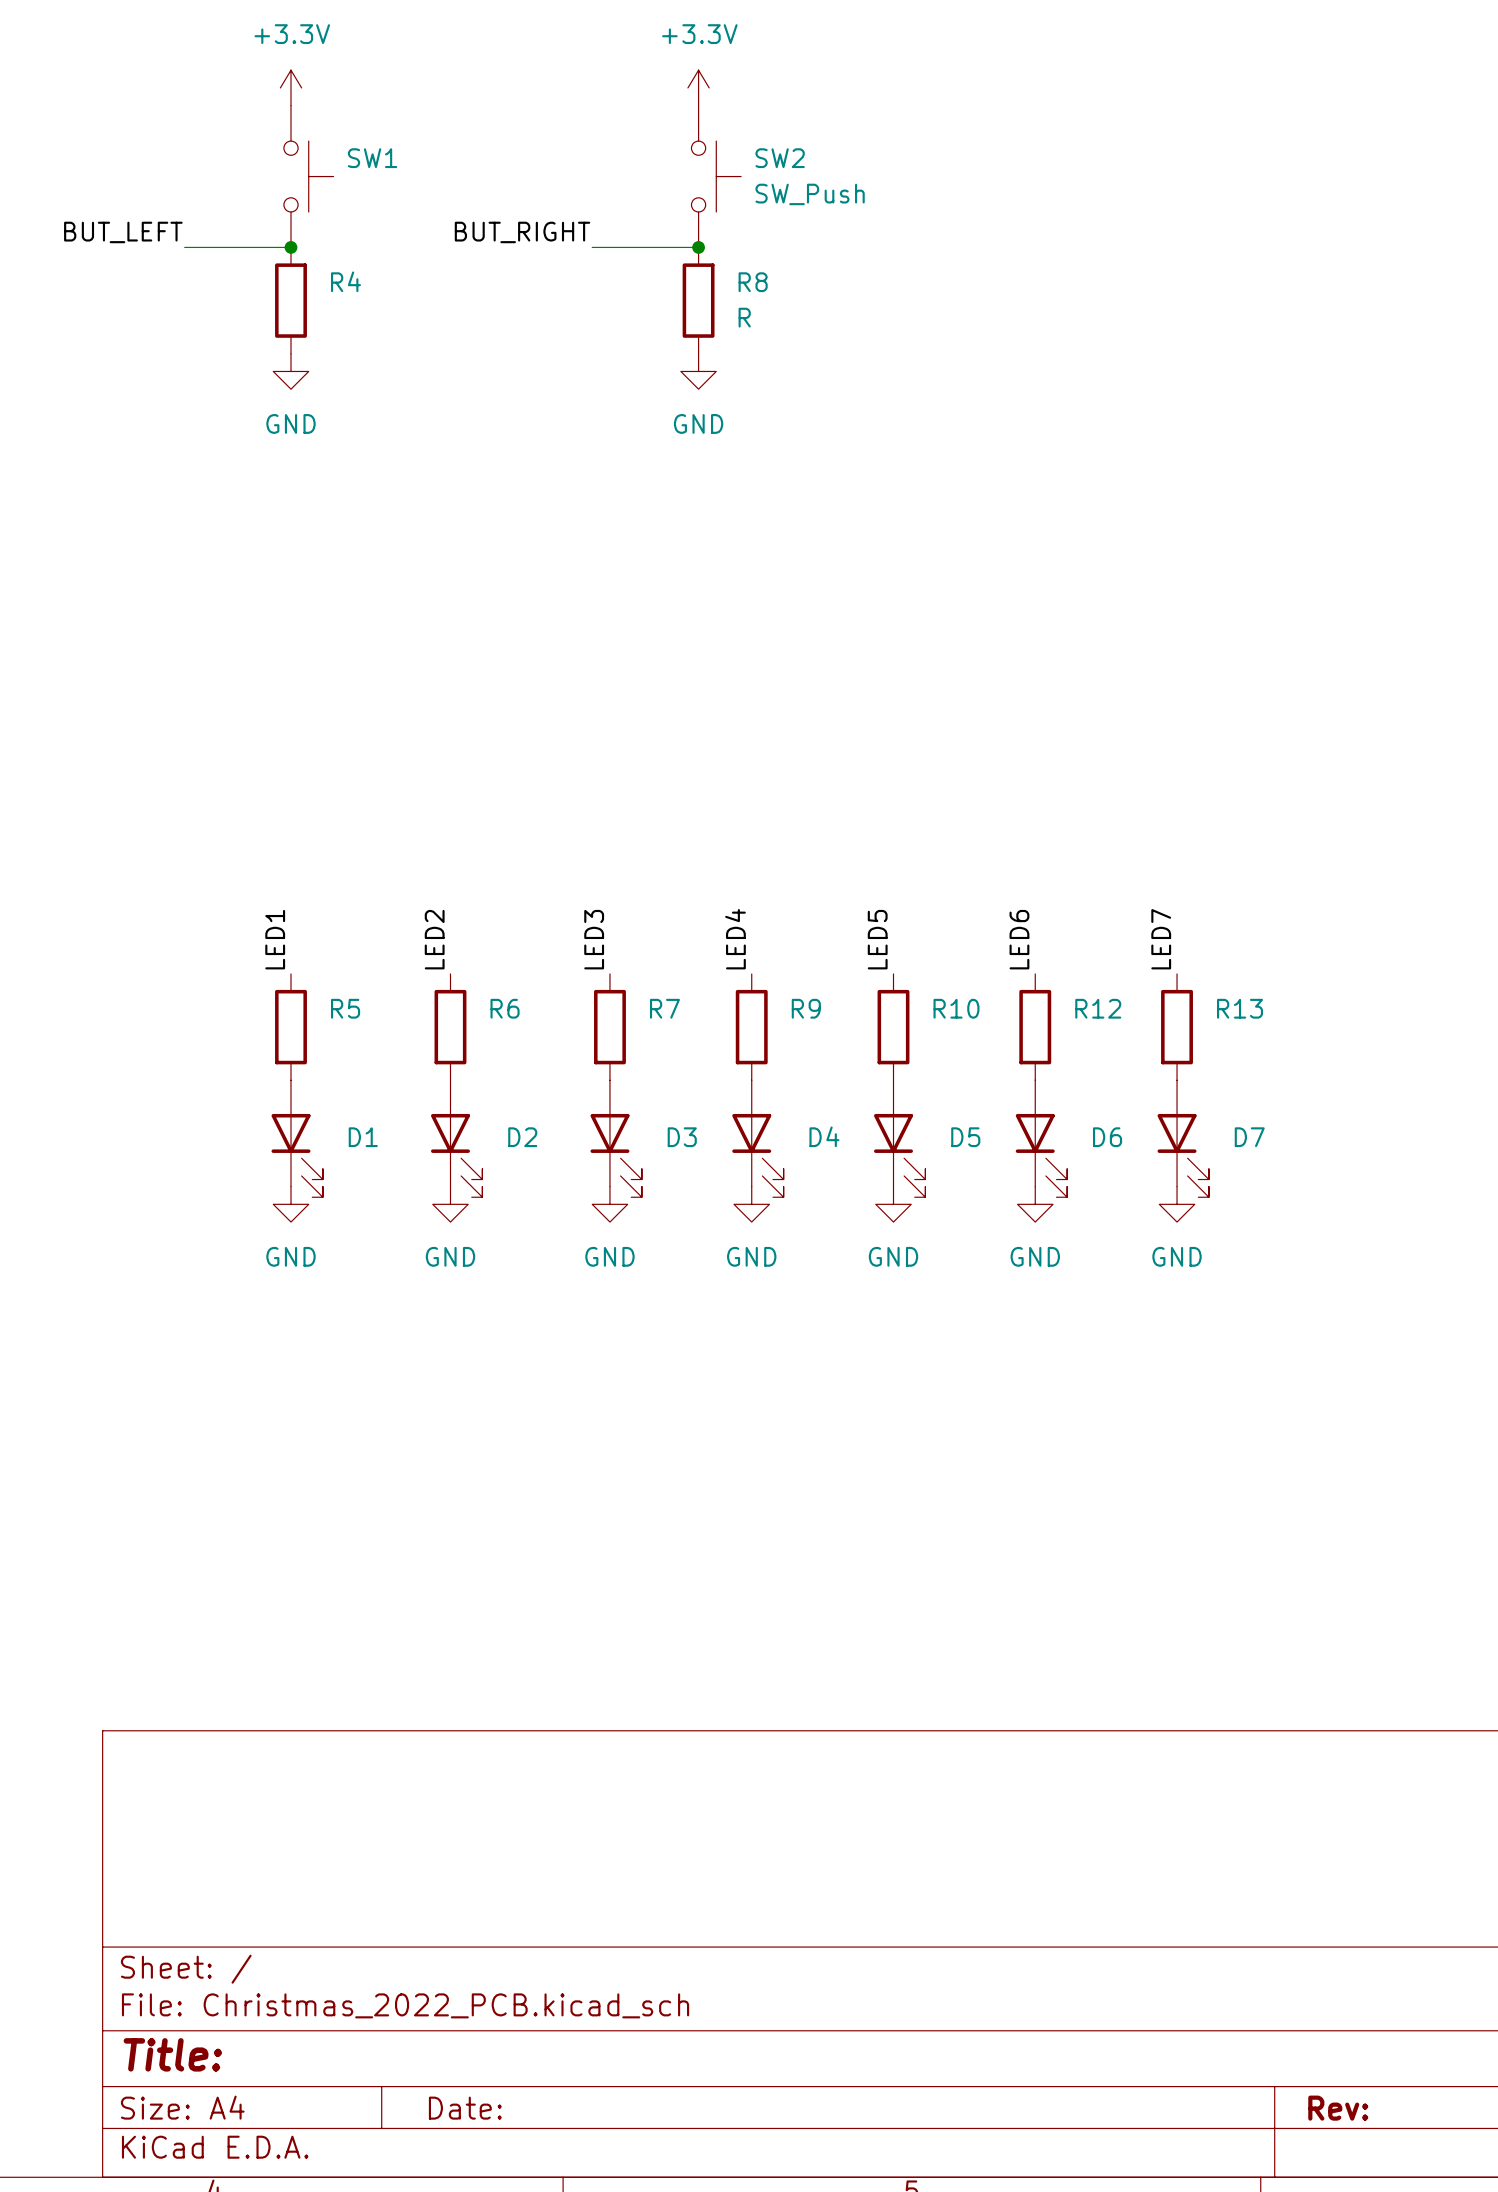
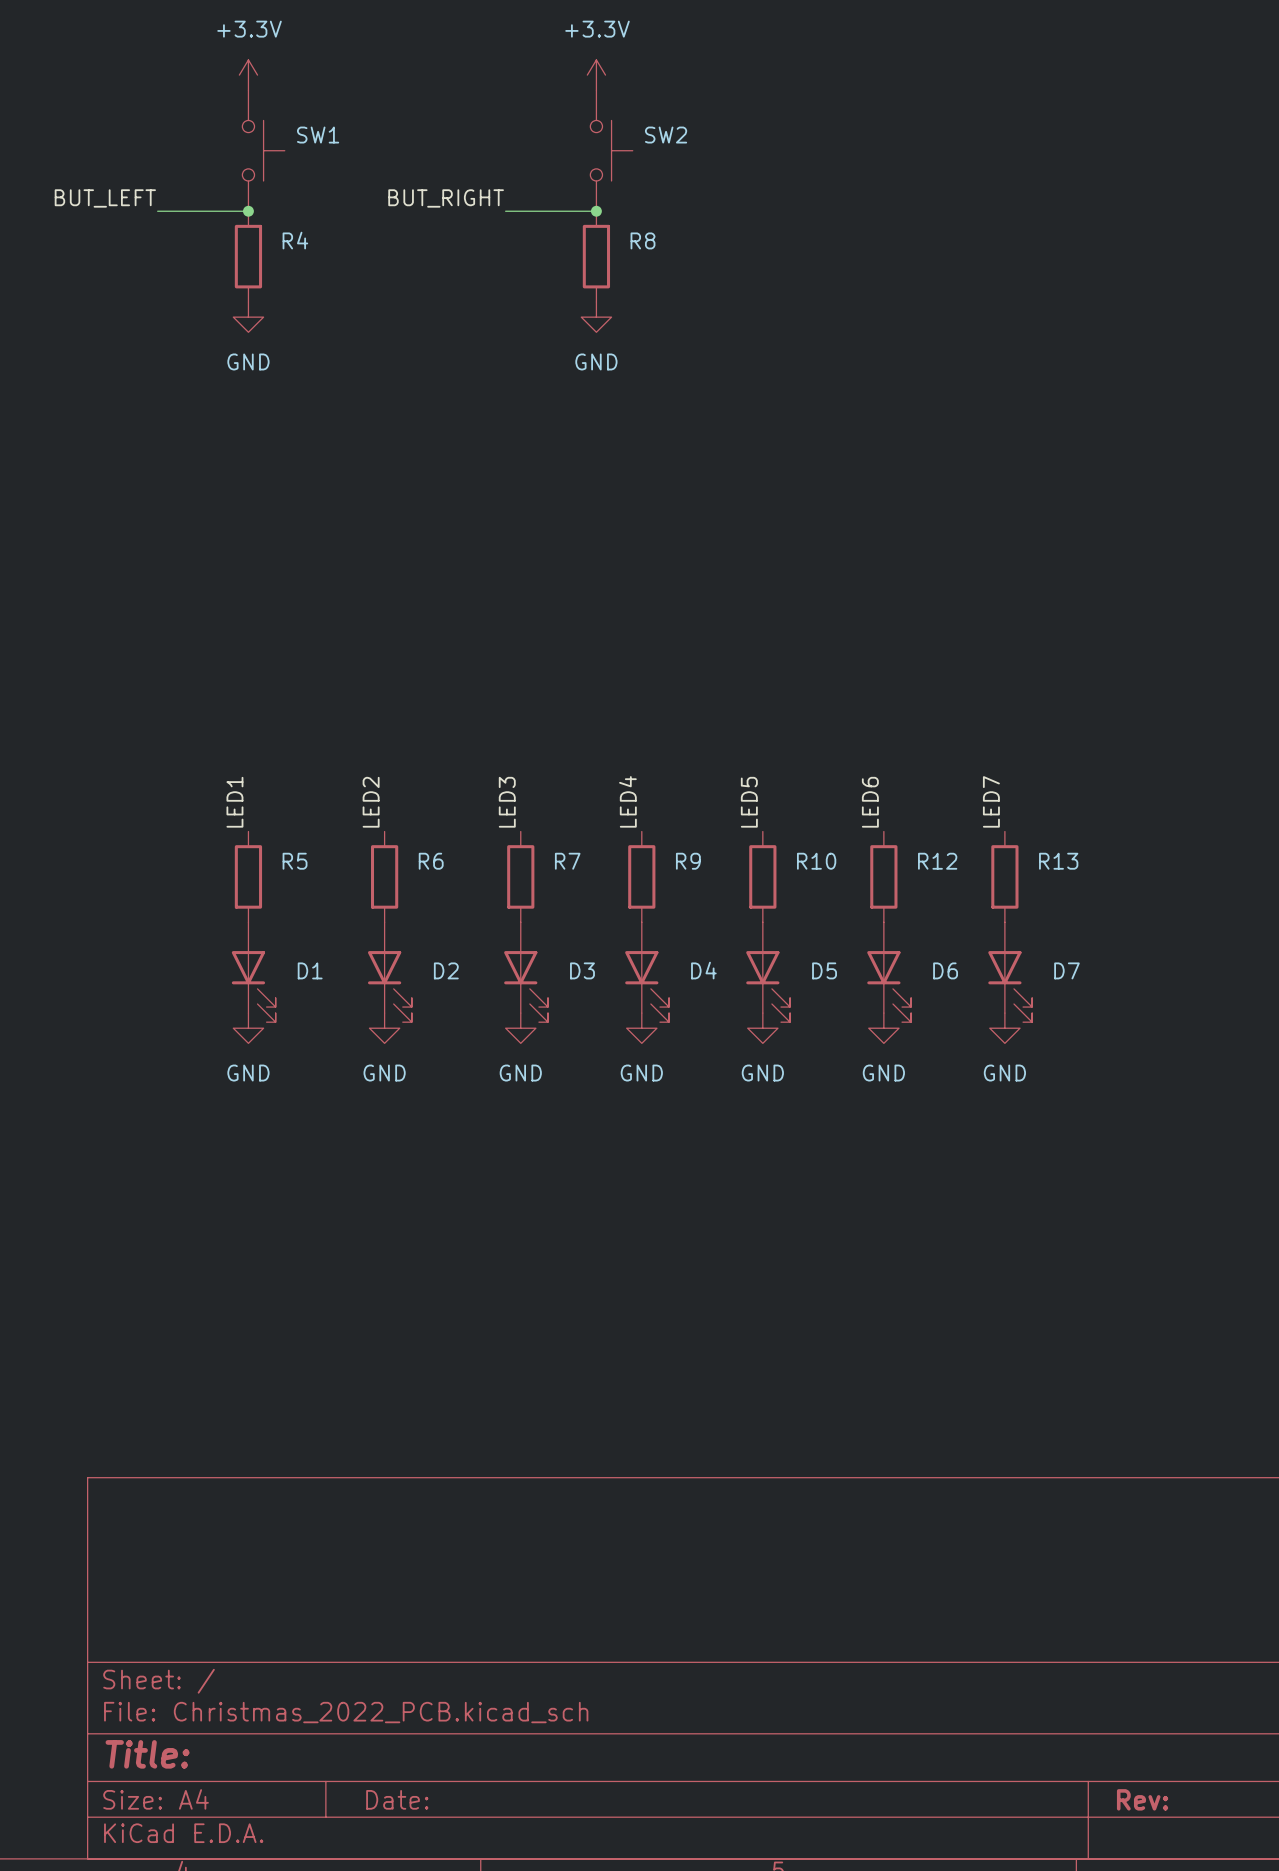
SW2 value: SW_Push (810, 194) -> none
R8 value: R (744, 317) -> none

